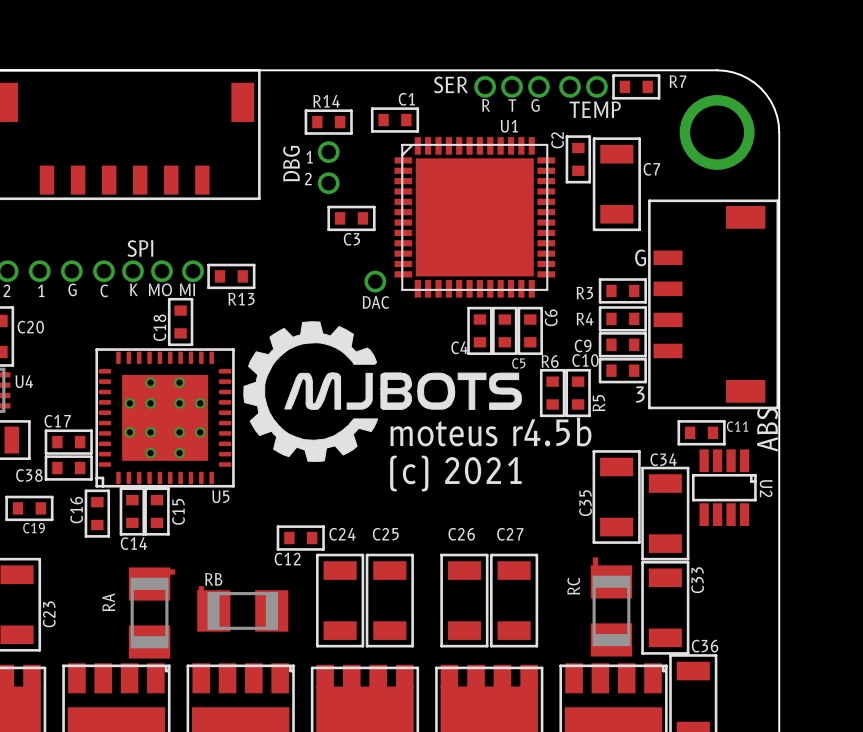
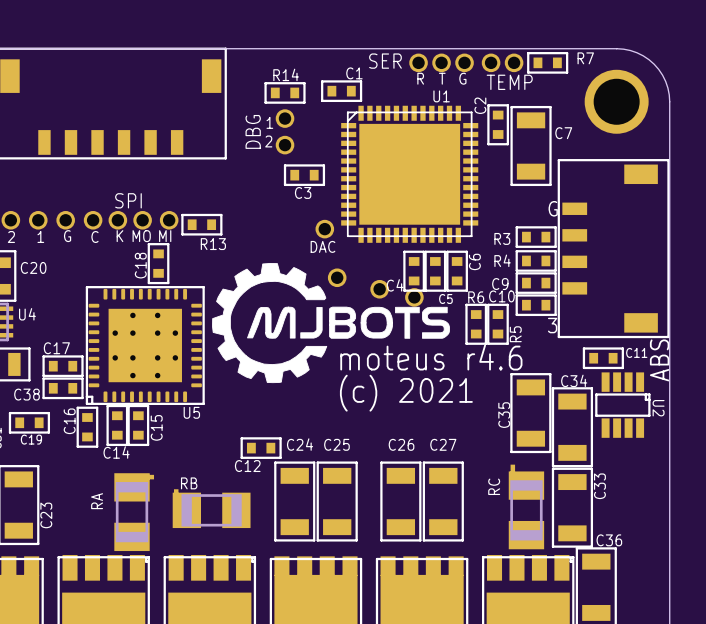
part: none -> (337, 277)
part: none -> (379, 289)
part: none -> (414, 297)
text: moteus r4.5b (490, 431) -> moteus r4.6 (431, 357)

